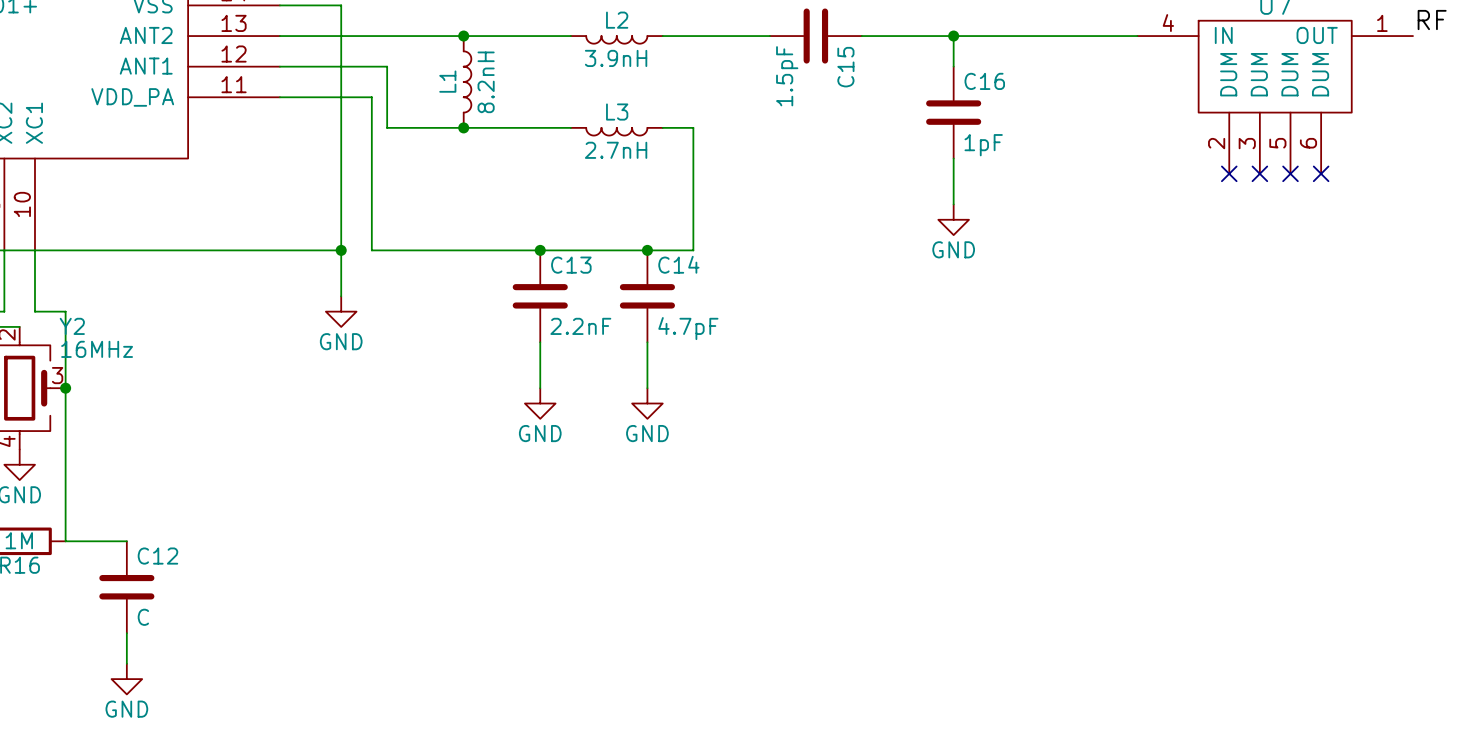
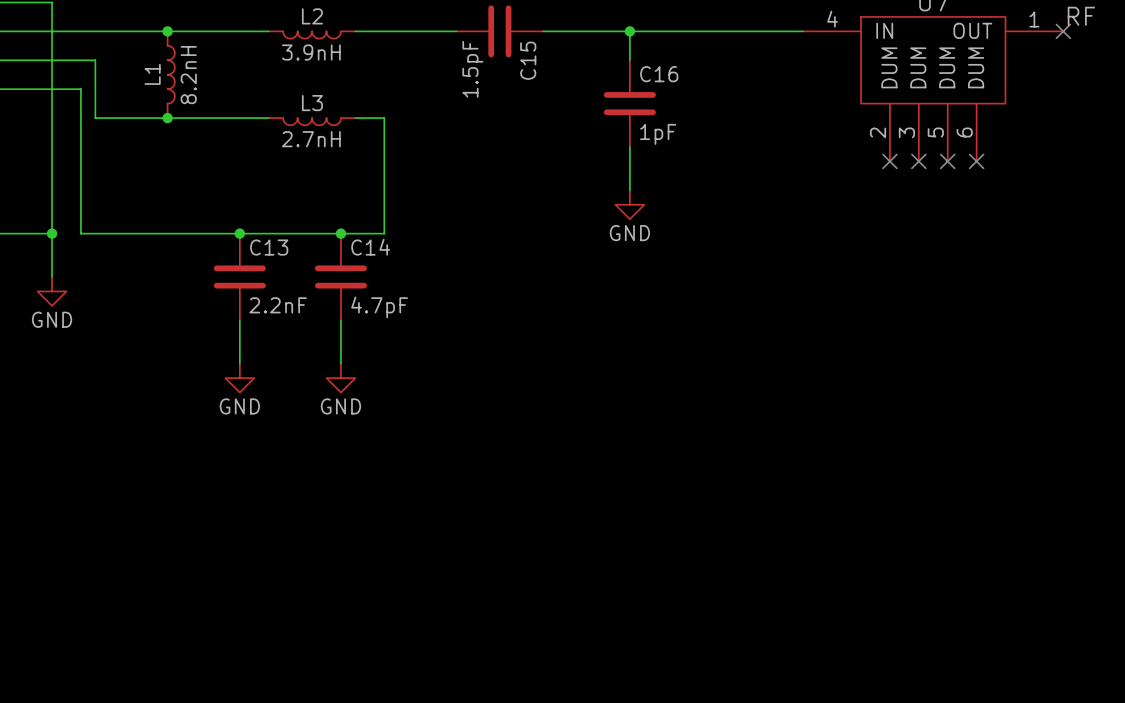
no-connect mark: none -> (1063, 31)

